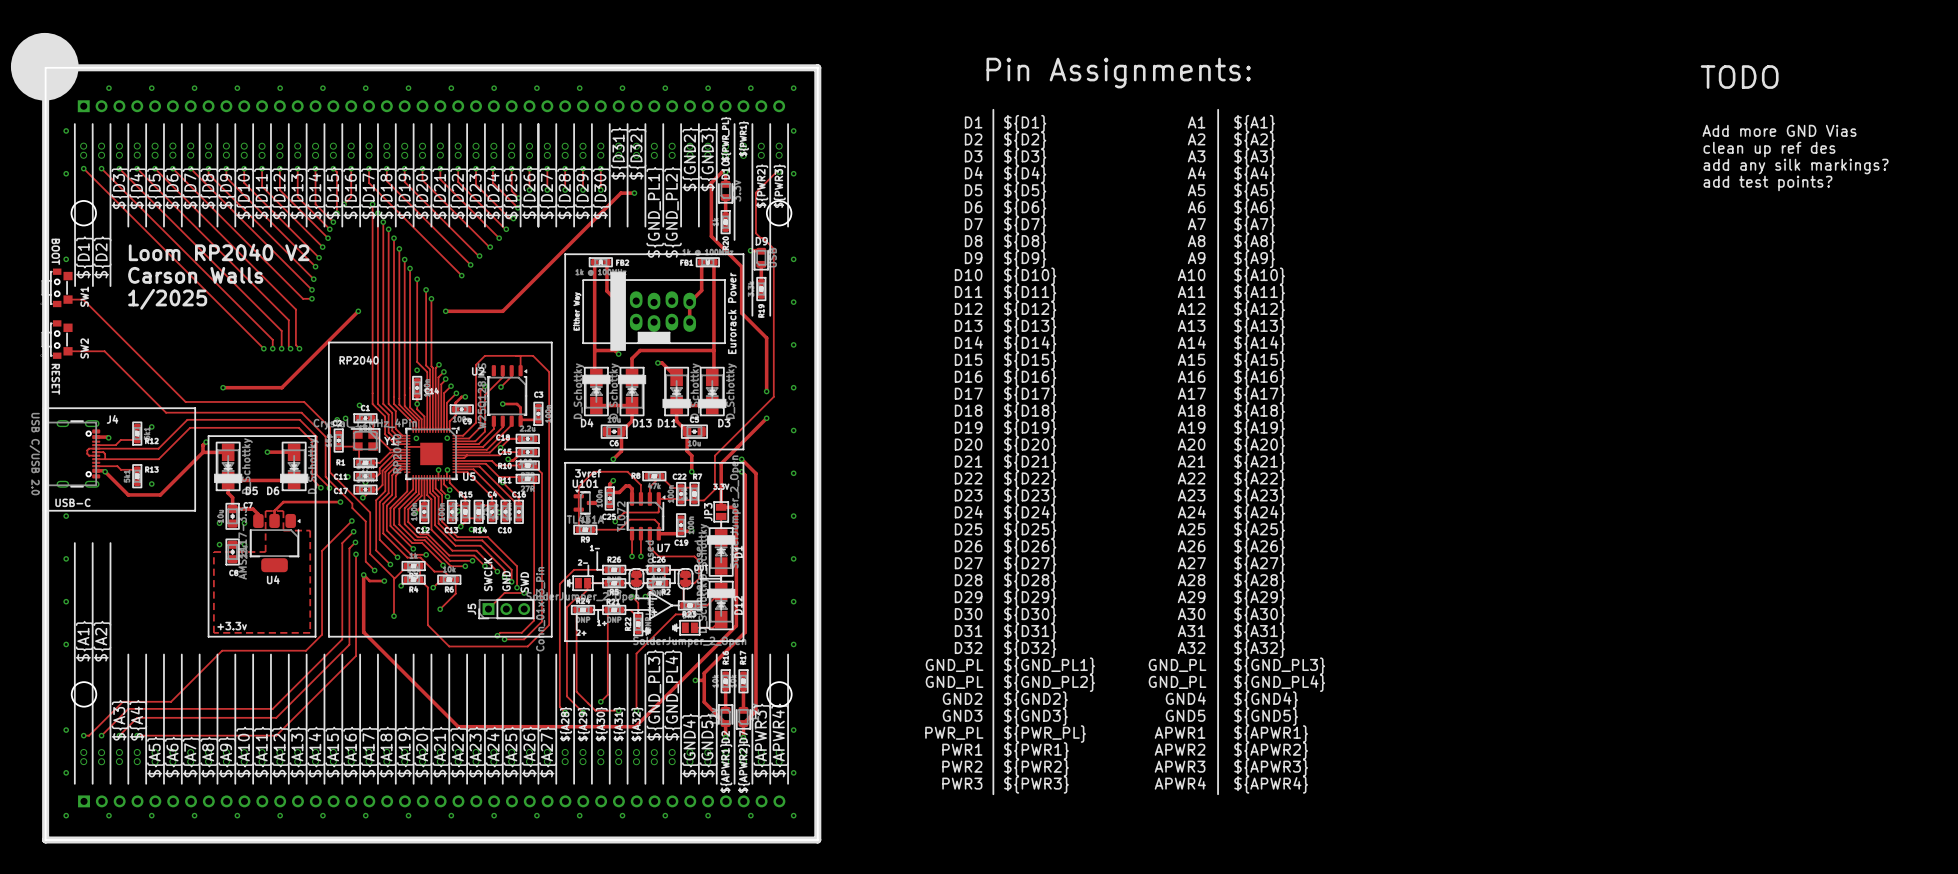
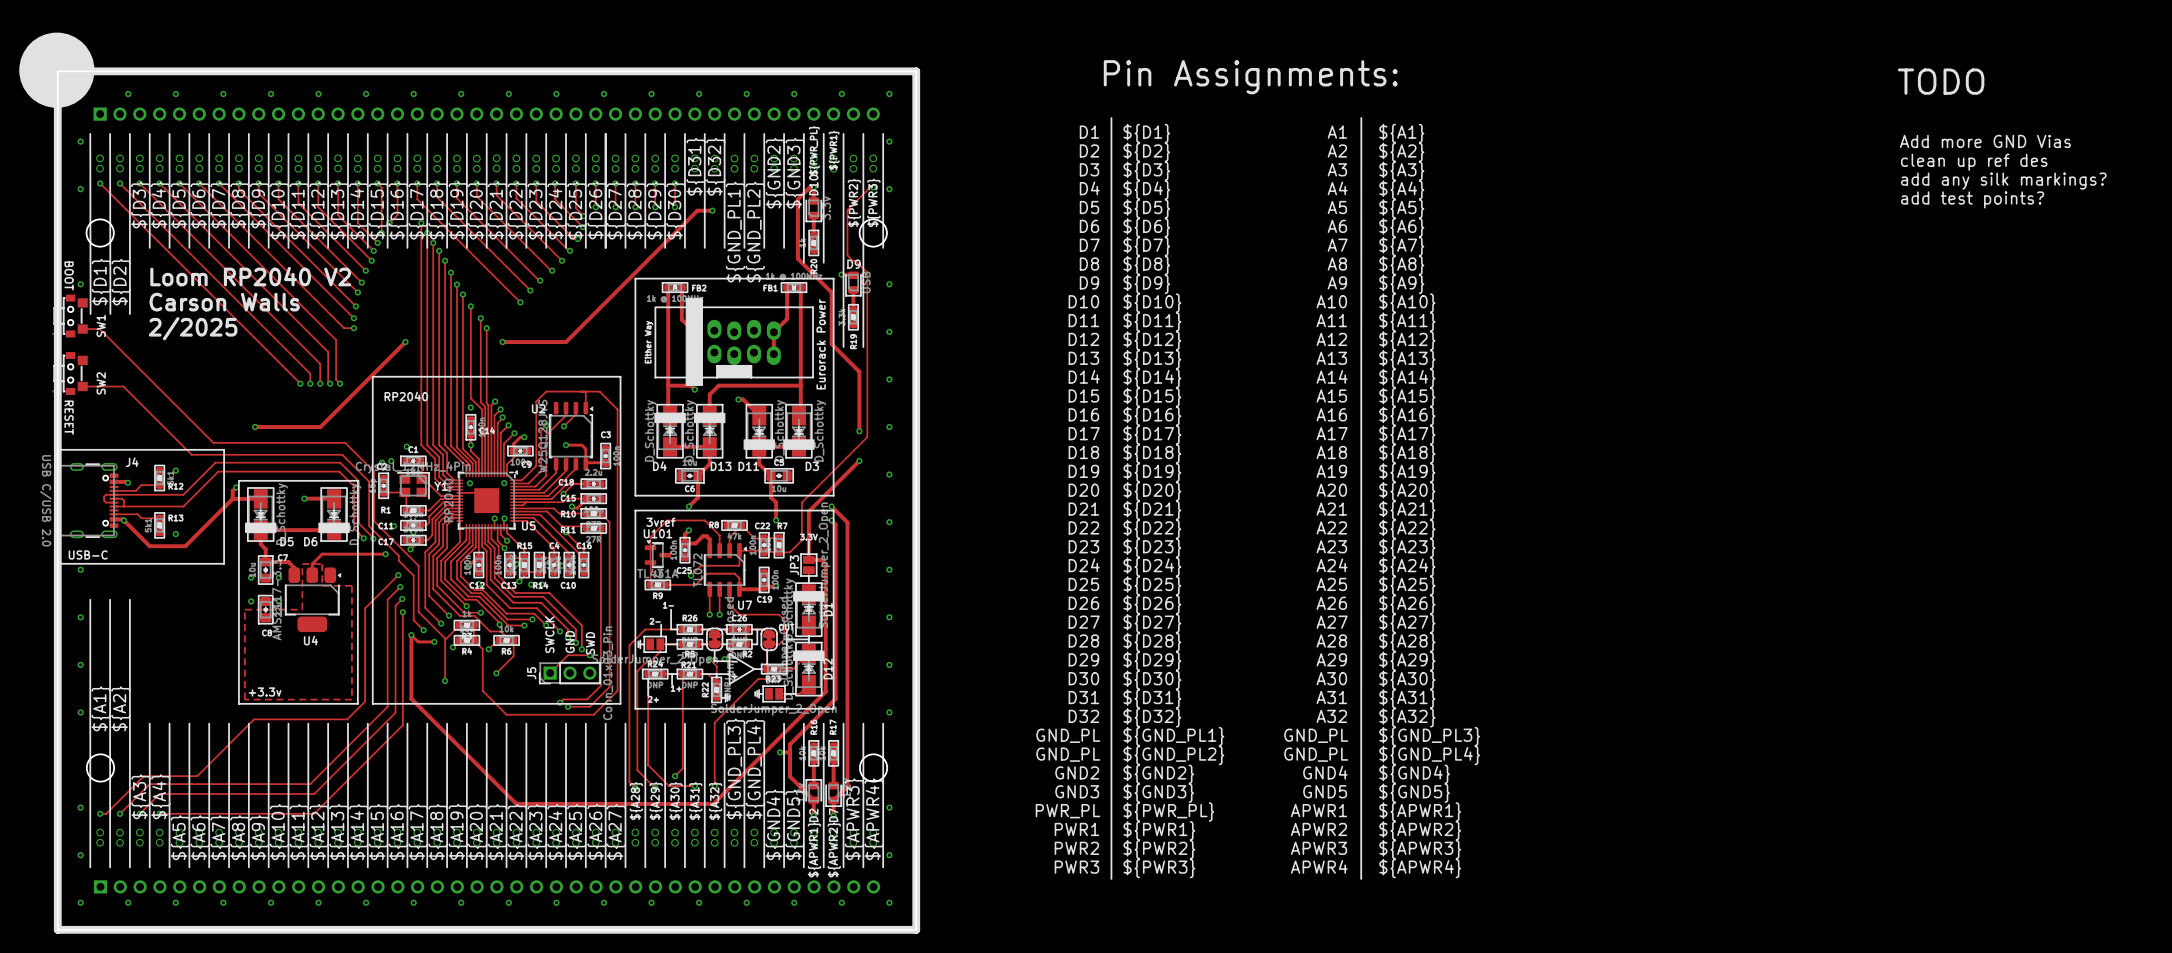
text: 1/2025 (167, 299) -> 2/2025 (193, 328)

